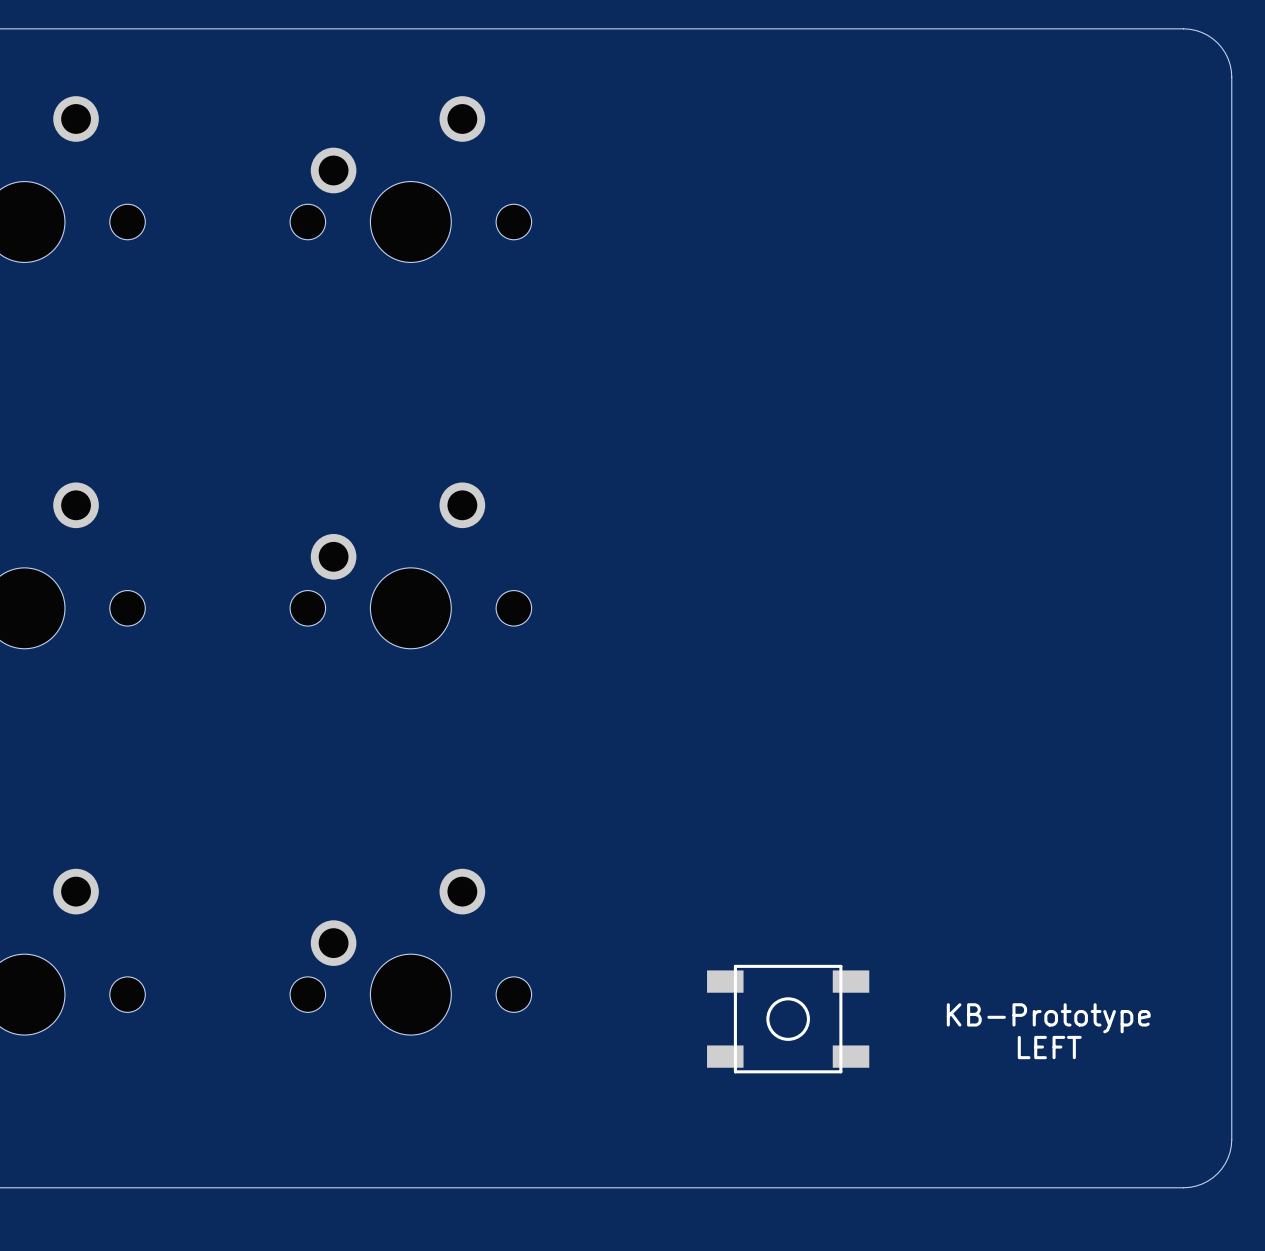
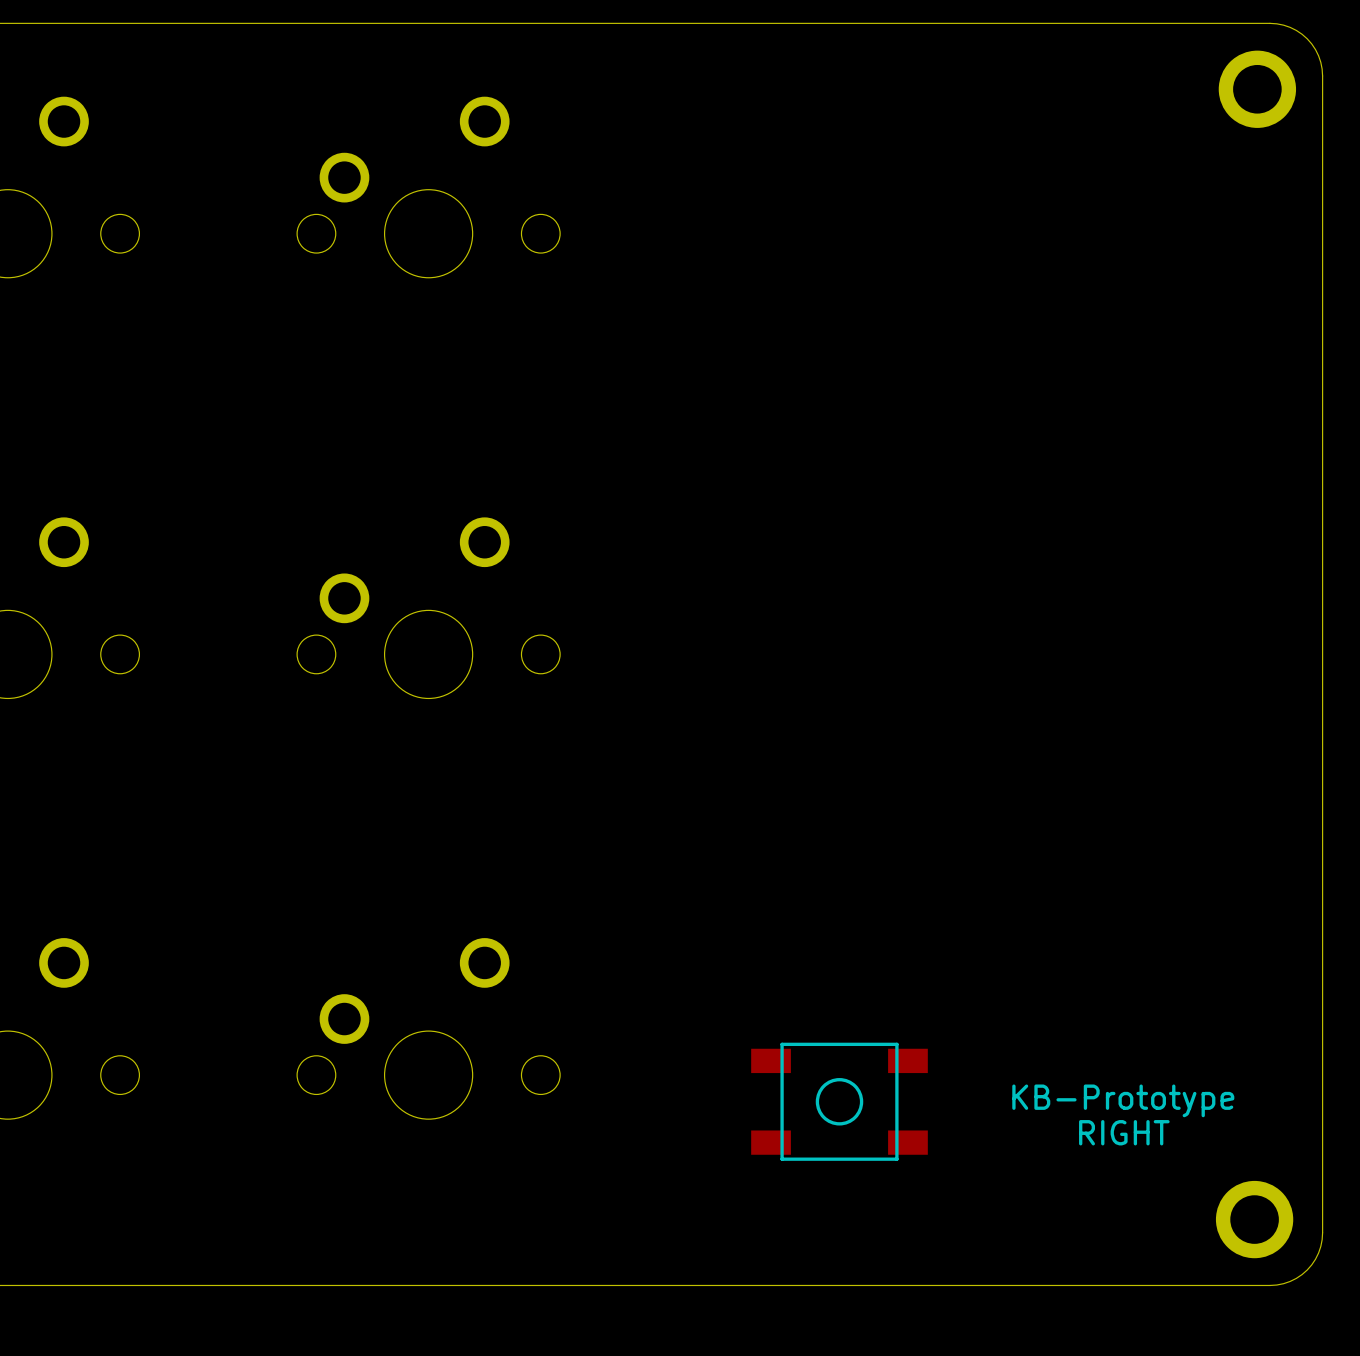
part: none -> (1257, 89)
text: LEFT (1049, 1047) -> RIGHT (1124, 1132)
part: none -> (1254, 1219)

